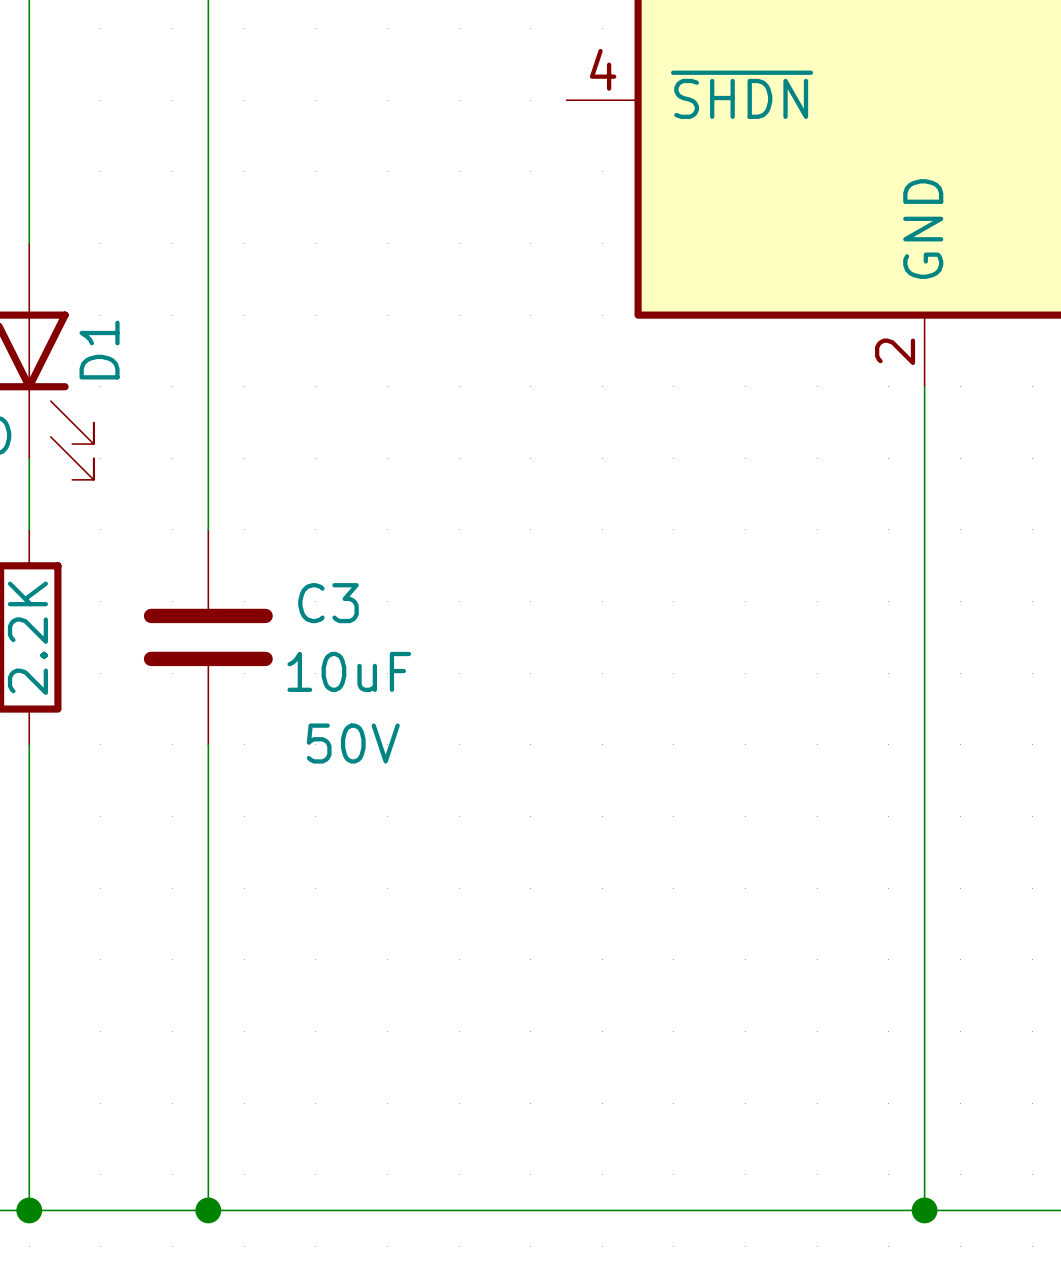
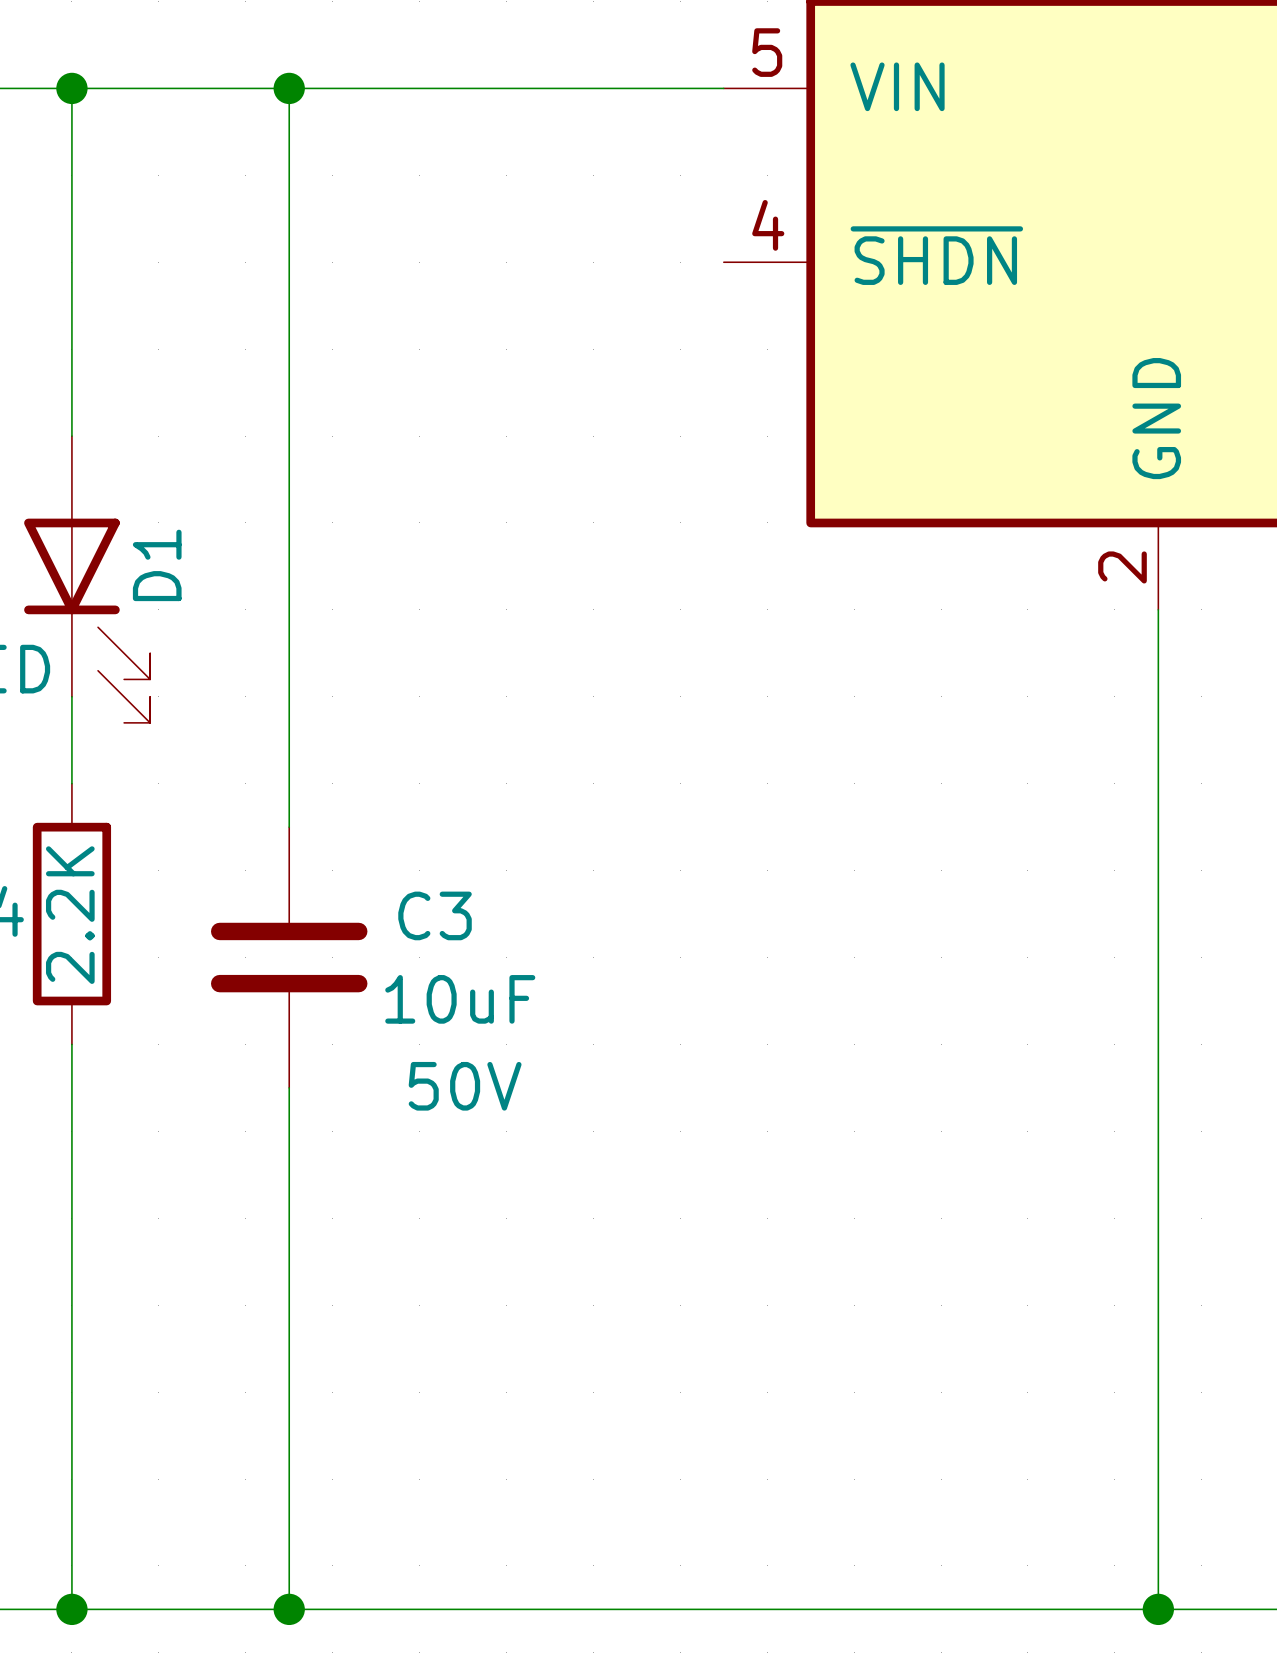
C3 position: (208, 637) -> (289, 957)

